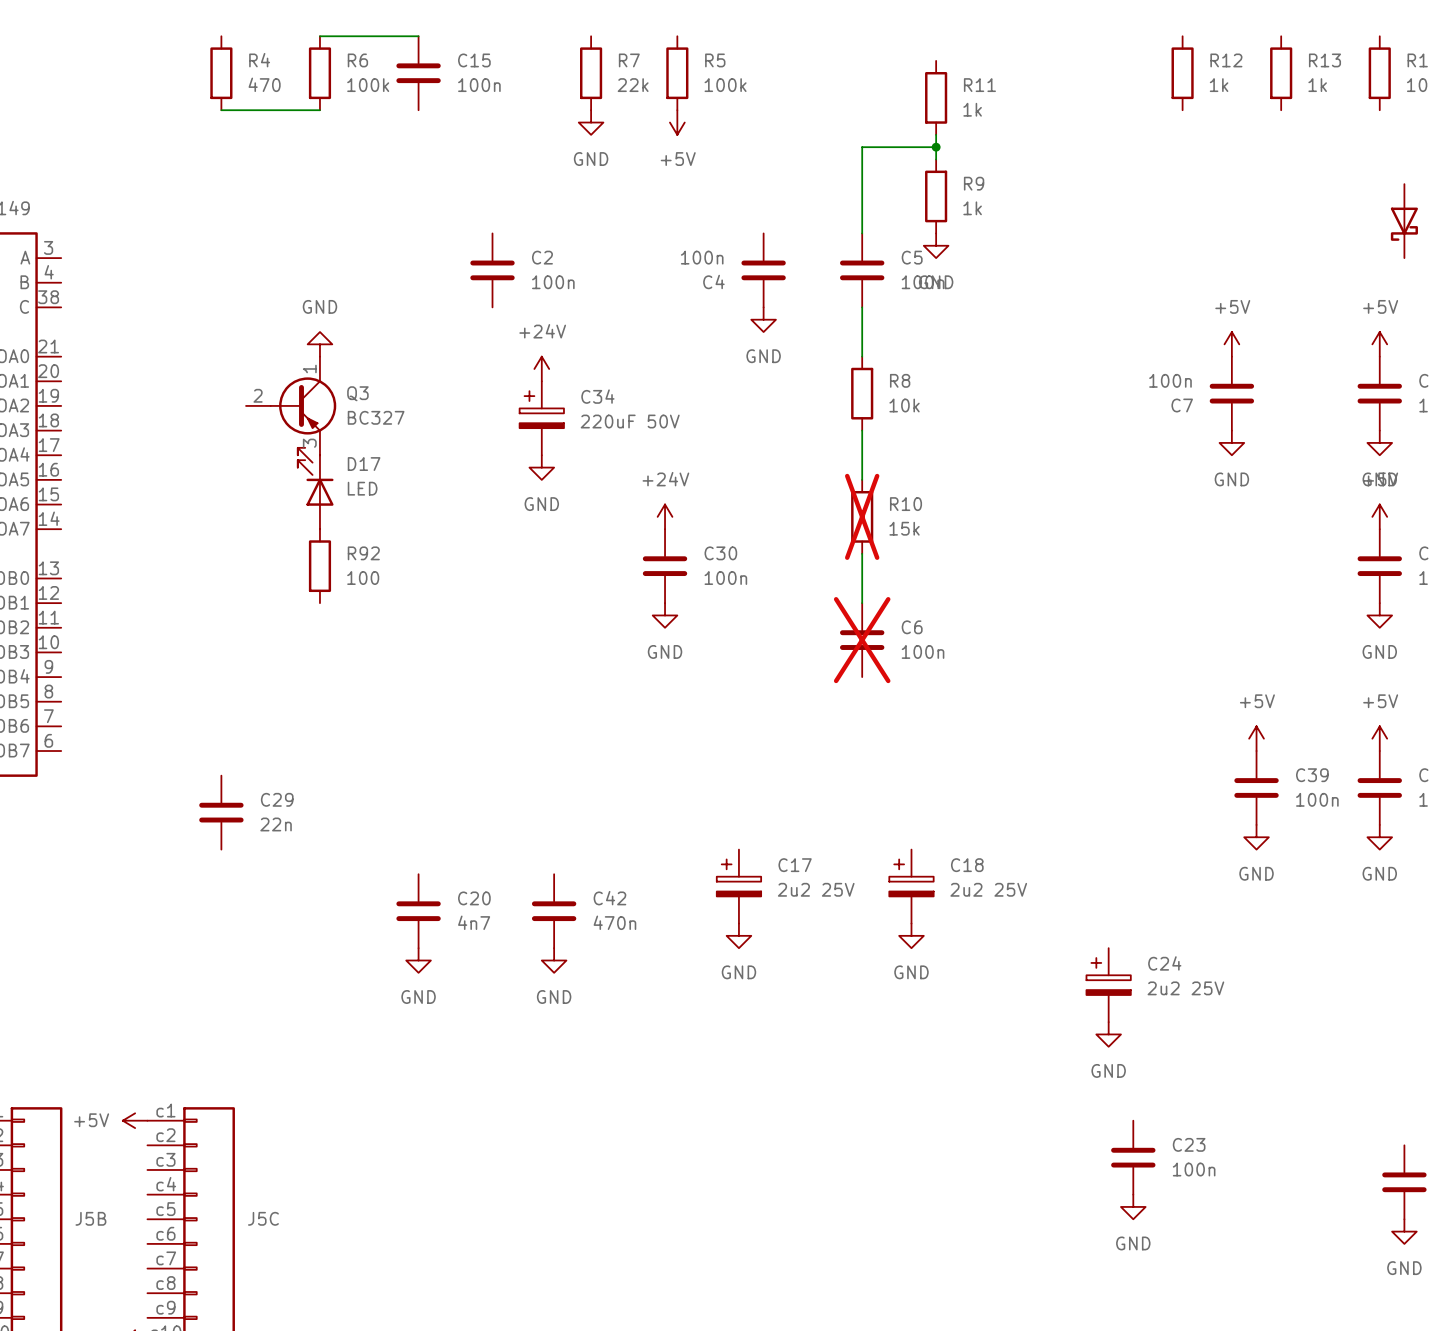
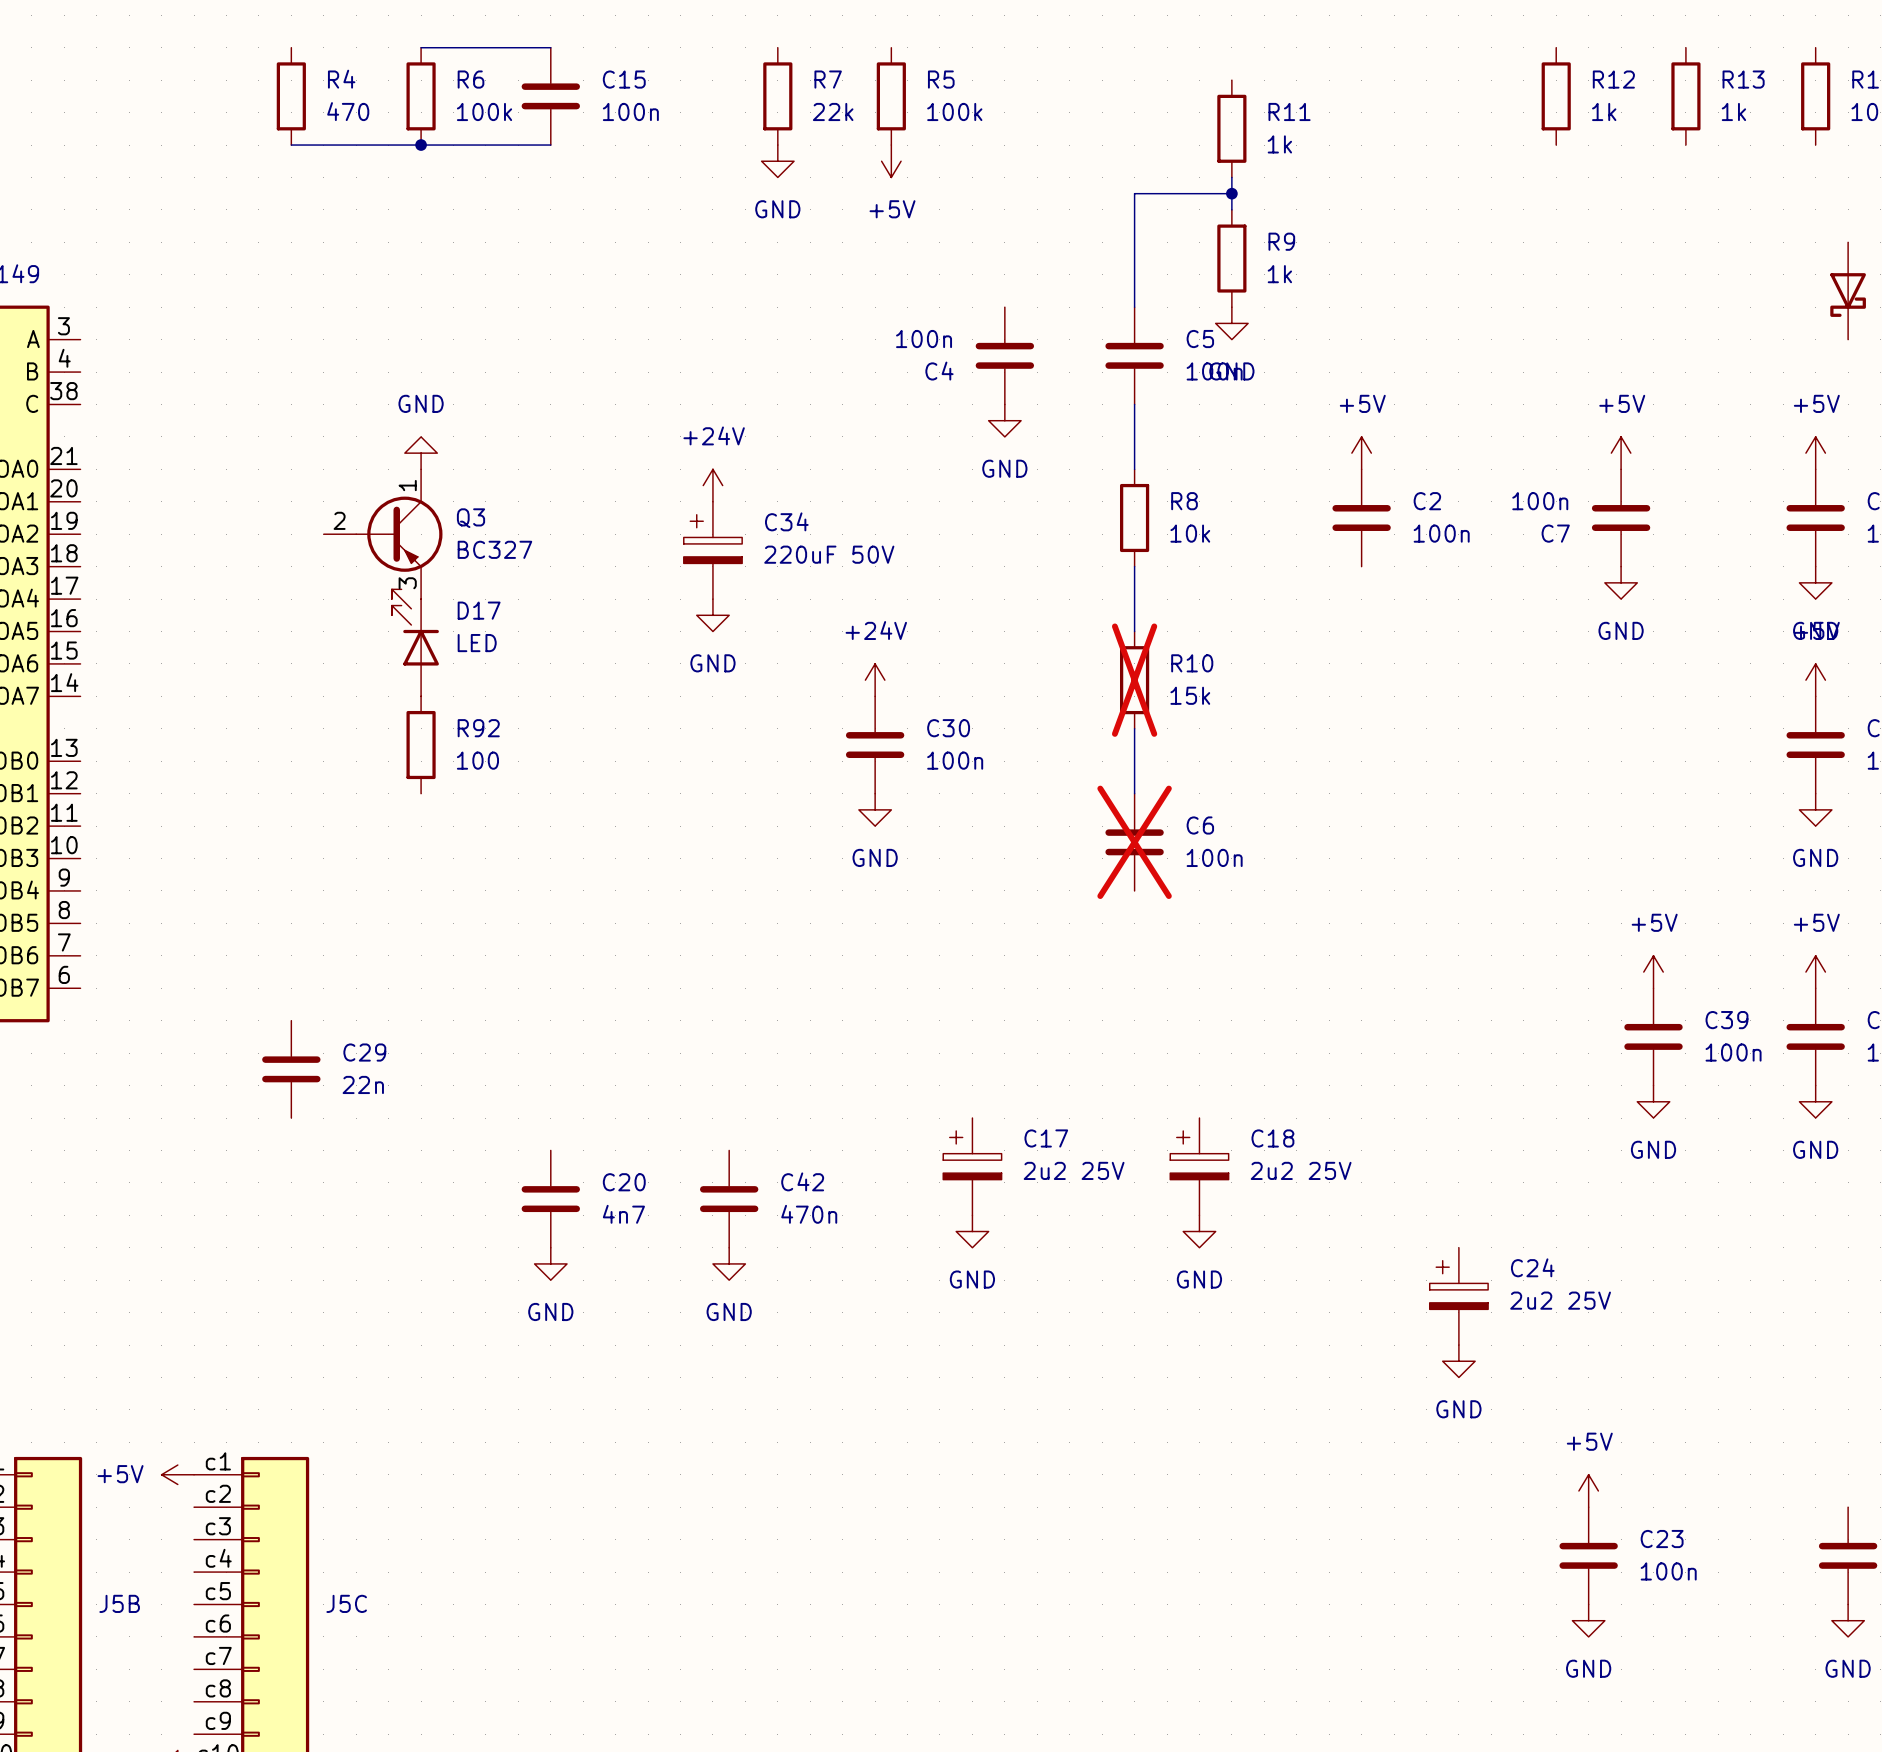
wire: none -> (421, 145) (550, 145)
junction: none -> (421, 145)
C2 position: (492, 270) -> (1361, 518)
power symbol: none -> +5V (1361, 453)
power symbol: none -> +5V (1588, 1490)
C23 position: (1133, 1157) -> (1588, 1555)
power symbol position: GND (1133, 1206) -> GND (1588, 1620)

